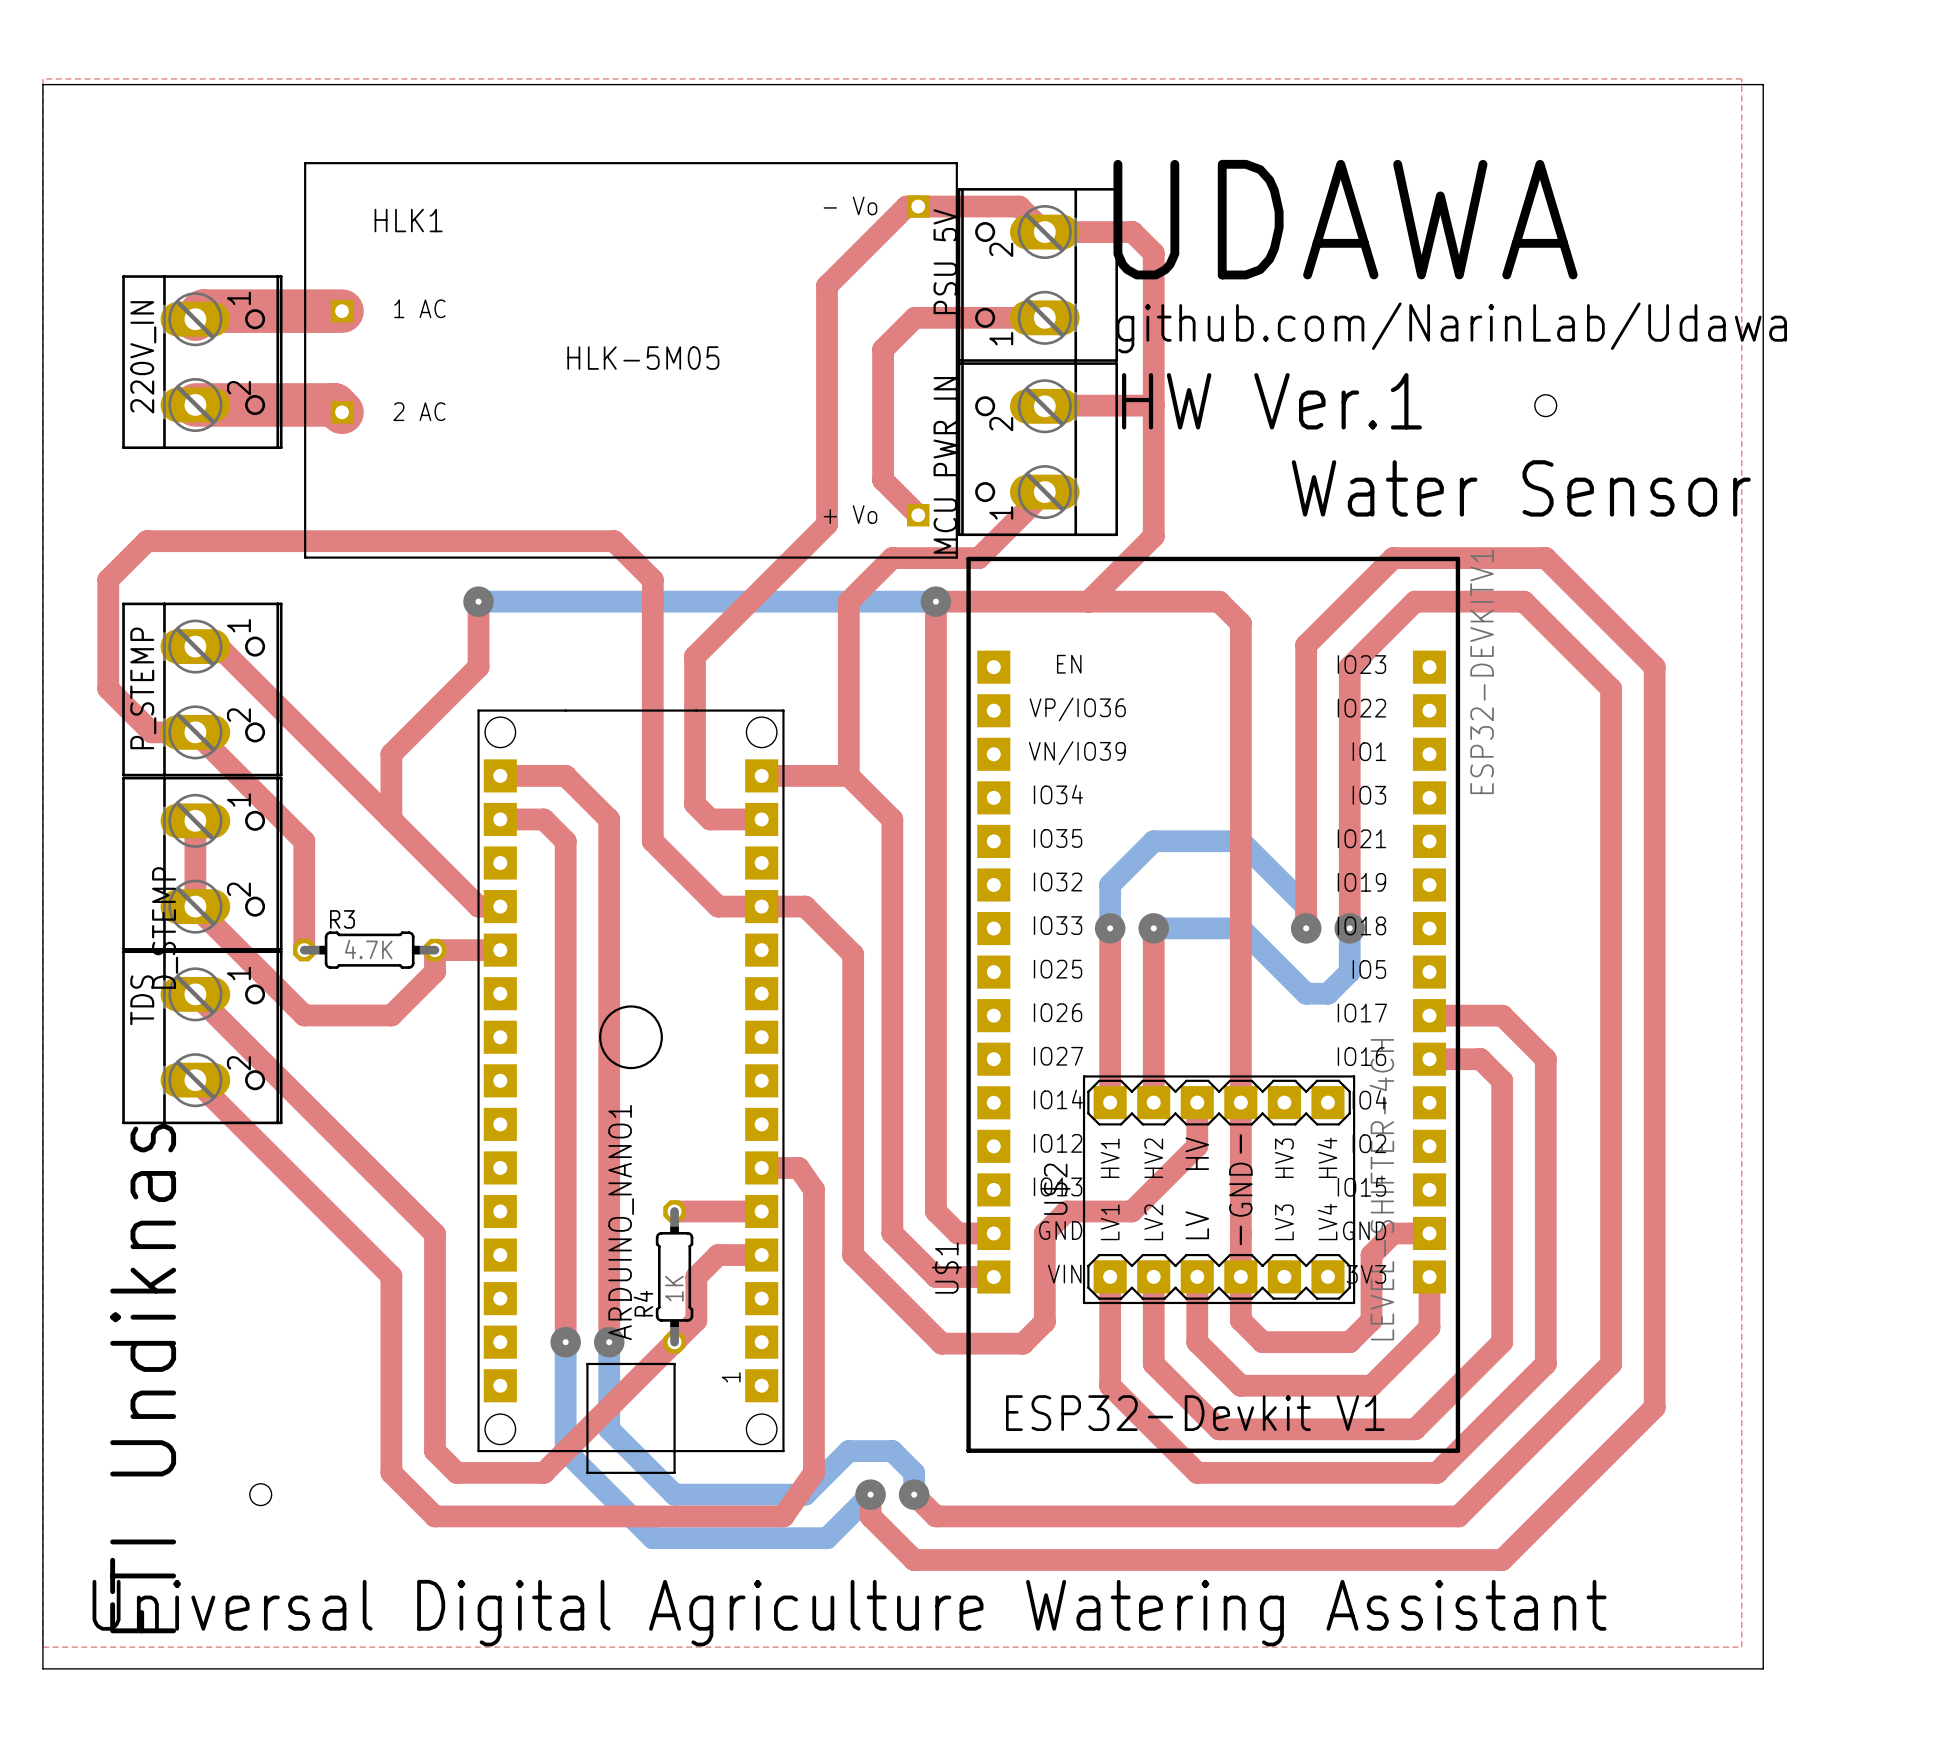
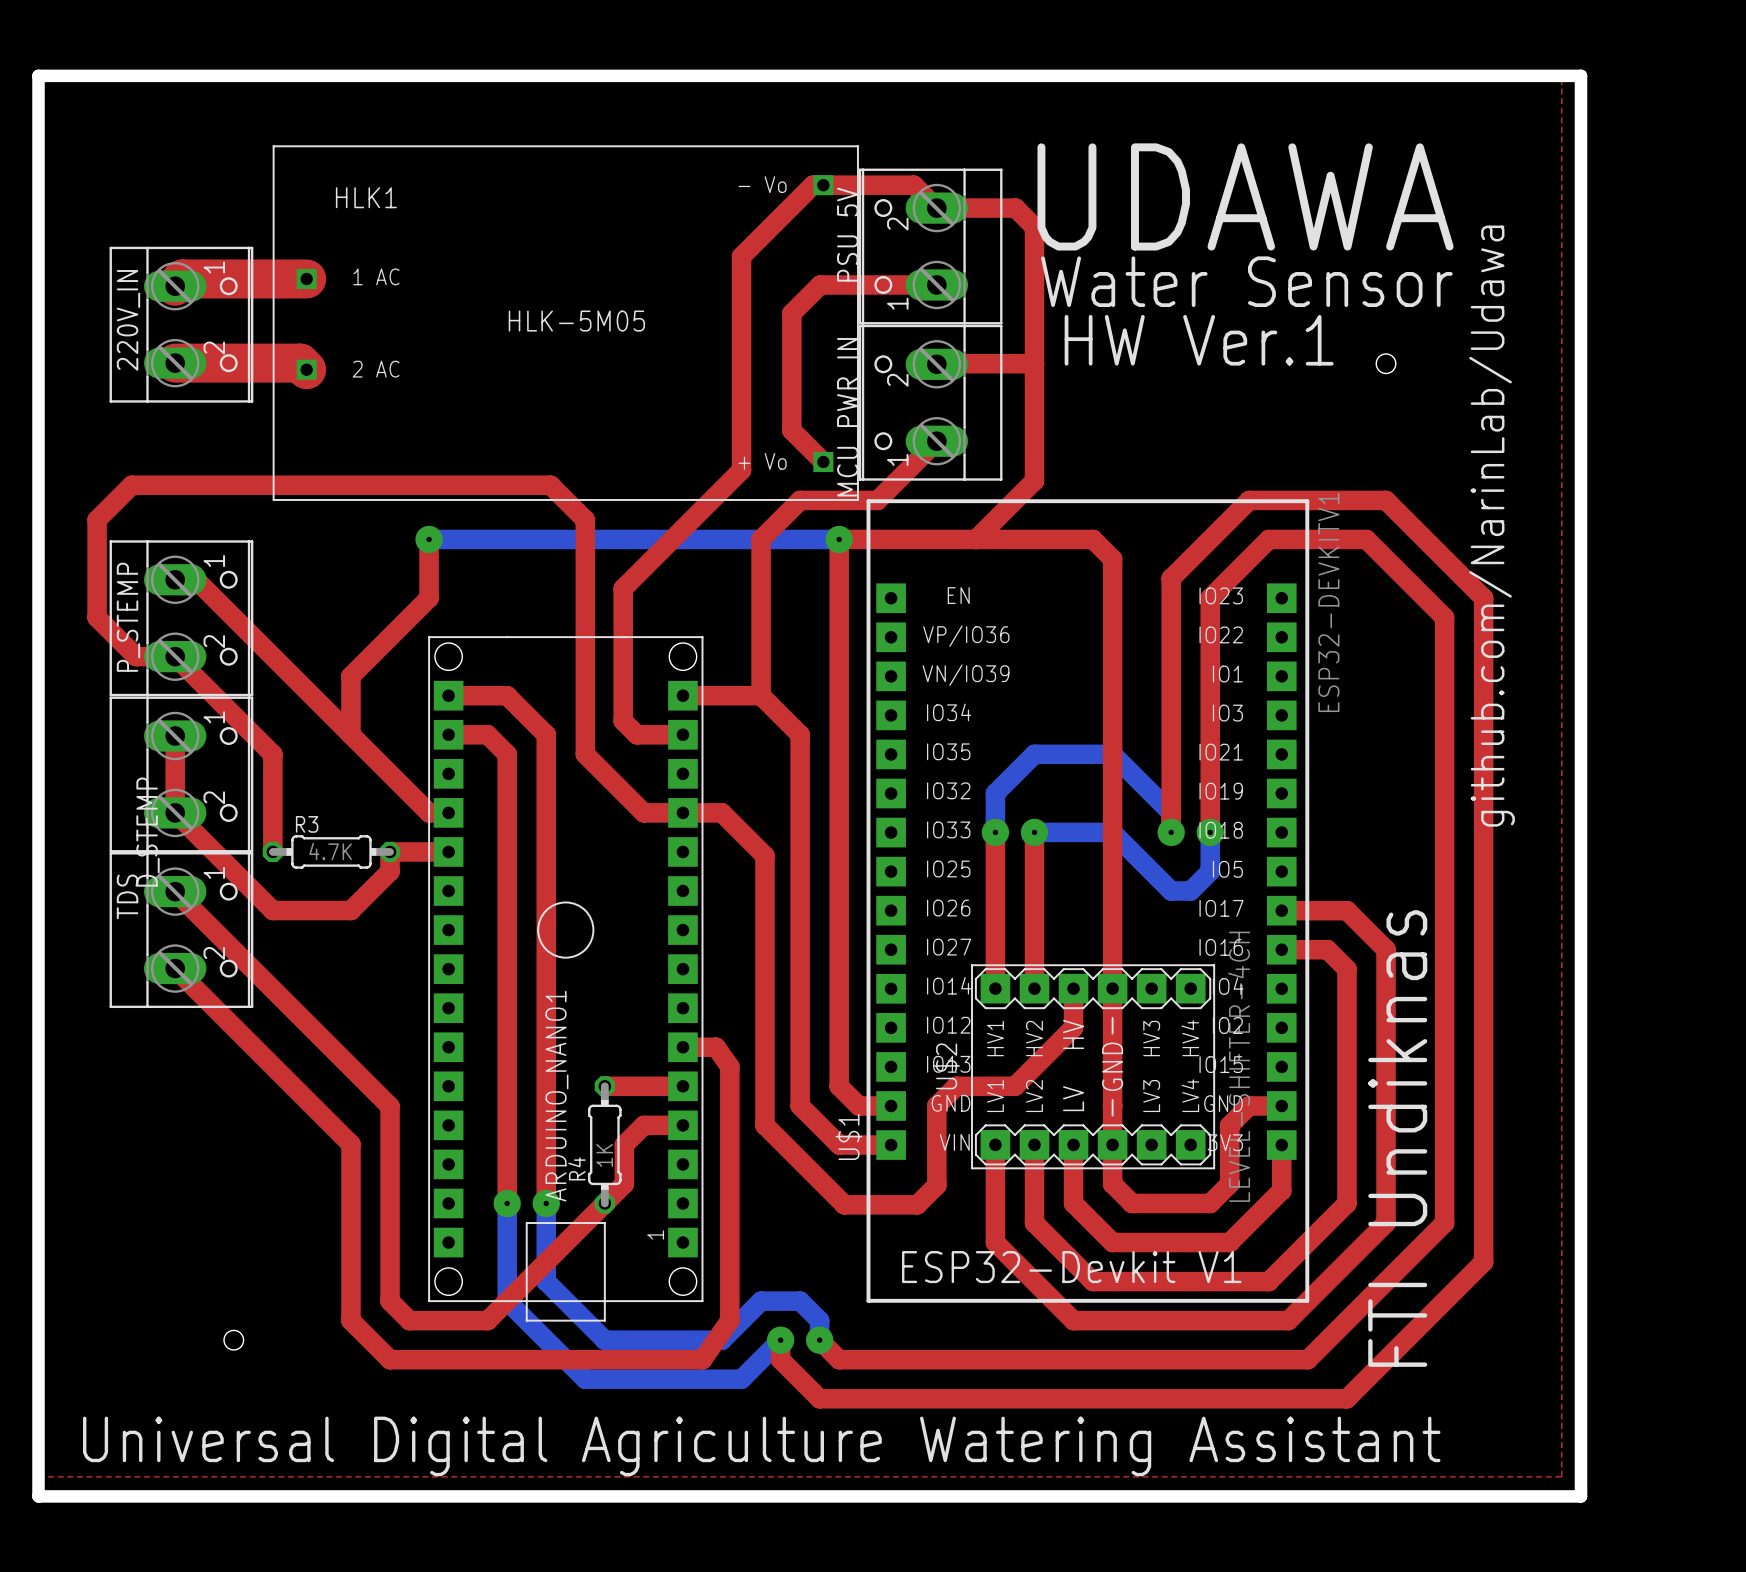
board edge width: thin (42, 84) (1763, 84) (1763, 1668) (42, 1668) (42, 84) -> thick (38, 75) (1581, 75) (1581, 1496) (38, 1496) (38, 75)
text position: UDAWA (1345, 219) -> UDAWA (1245, 196)
text: github.com/NarinLab/Udawa (1451, 327) -> none
text position: HW Ver.1 (1271, 401) -> HW Ver.1 (1199, 340)
text position: Water Sensor (1521, 488) -> Water Sensor (1246, 281)
text: none -> github.com/NarinLab/Udawa (1492, 526)
text: none -> FTI Undiknas (1397, 1138)
text: FTI Undiknas (143, 1378) -> none

